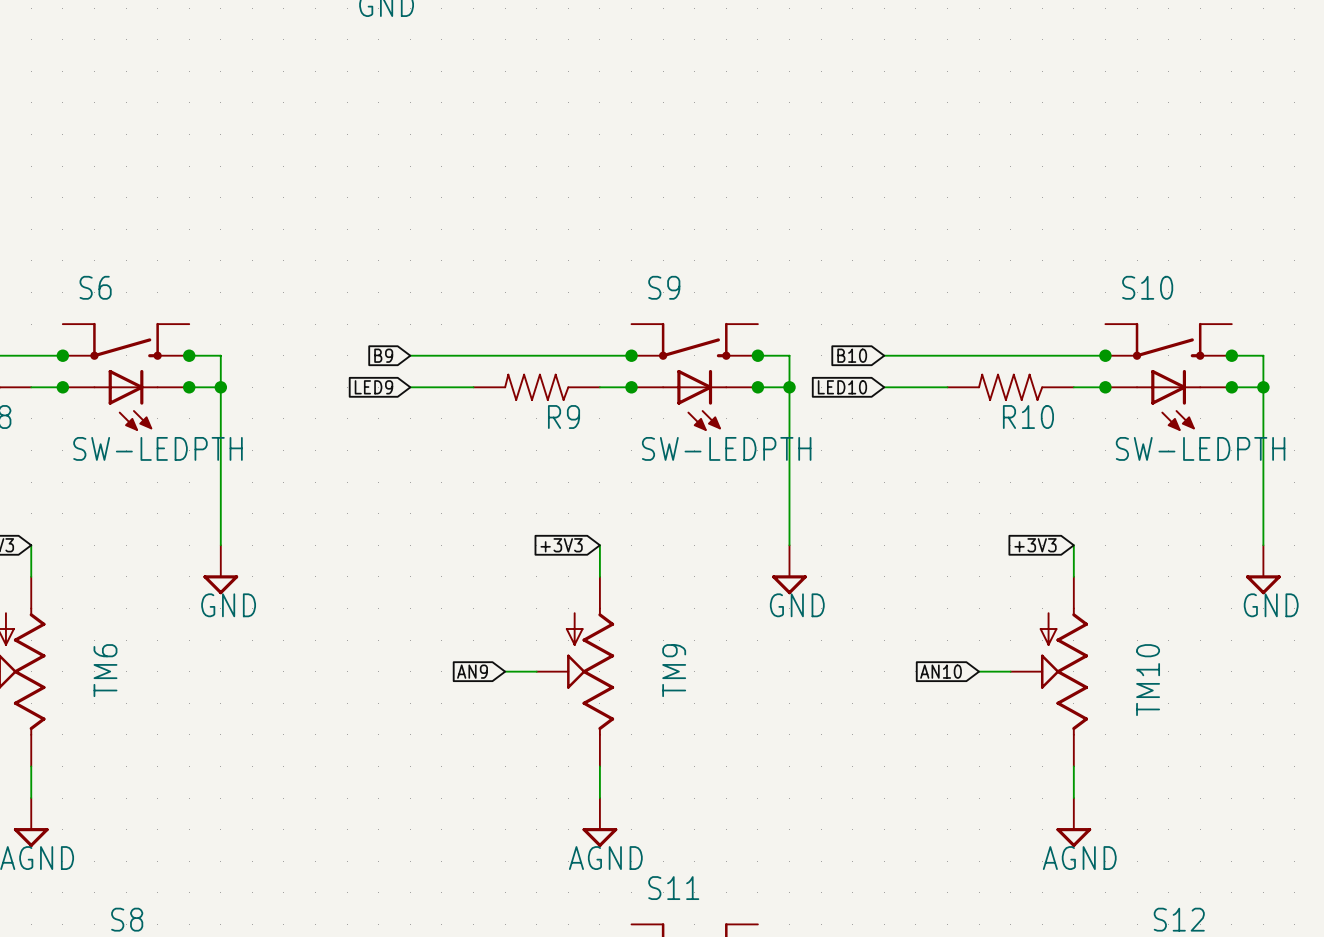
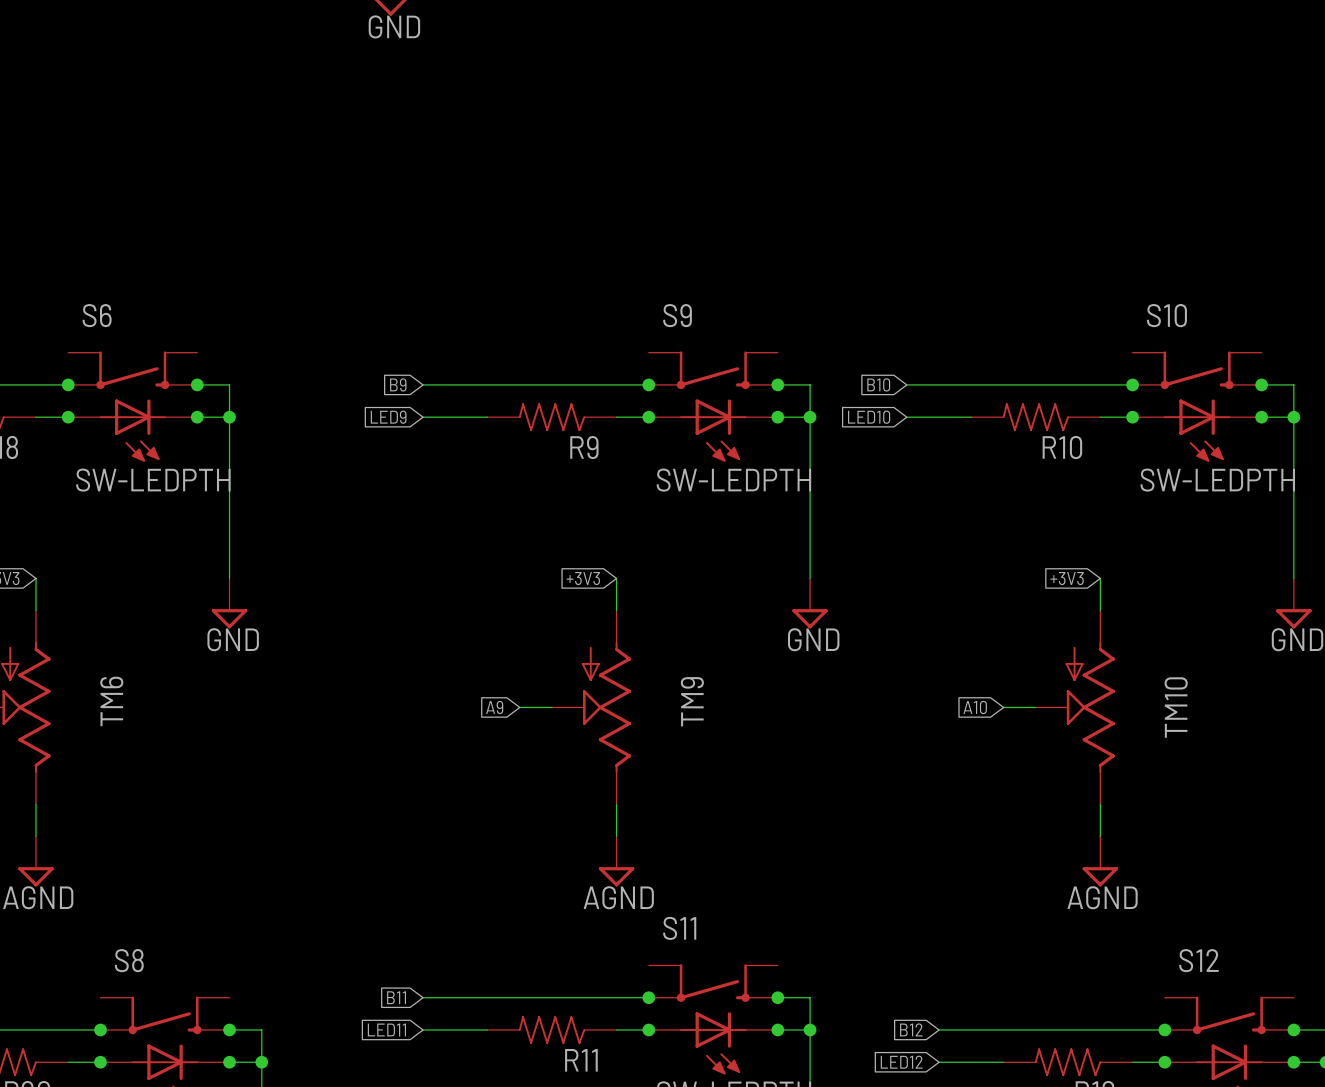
global label: AN9 (472, 671) -> A9 (494, 707)
global label: AN10 (941, 671) -> A10 (975, 707)

